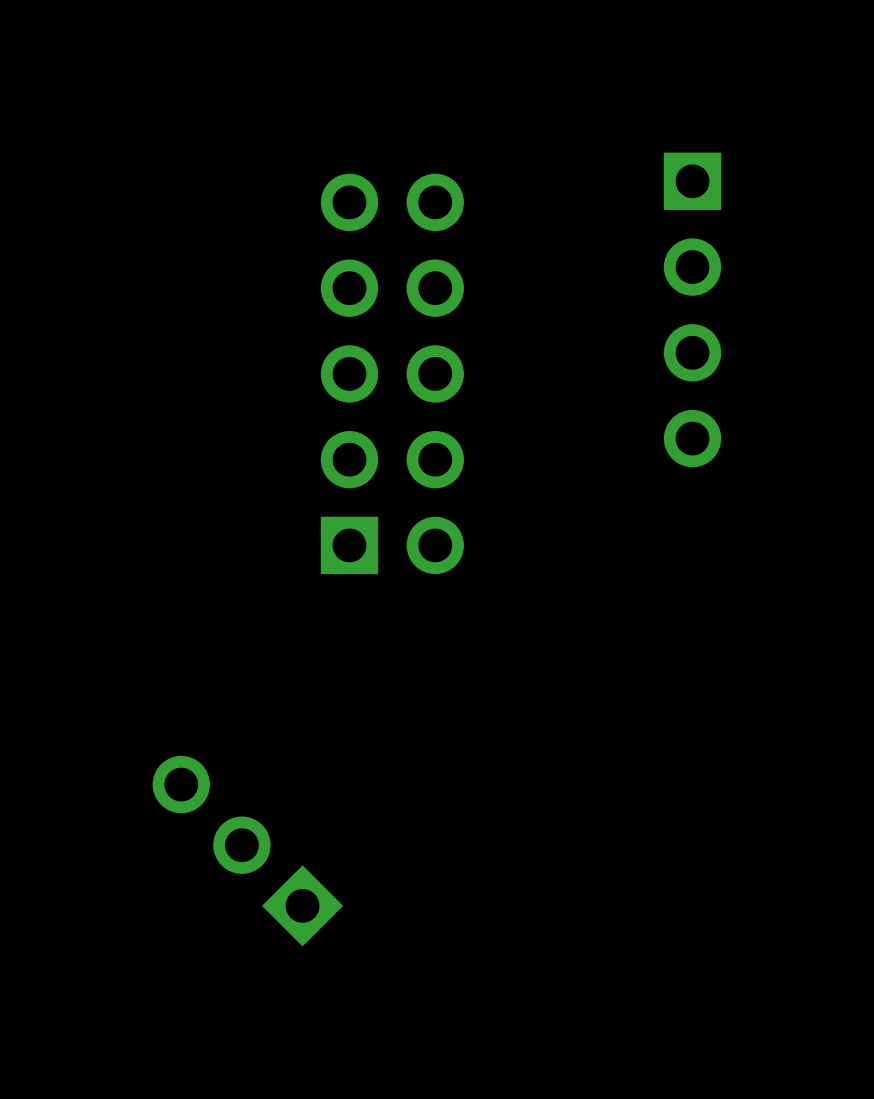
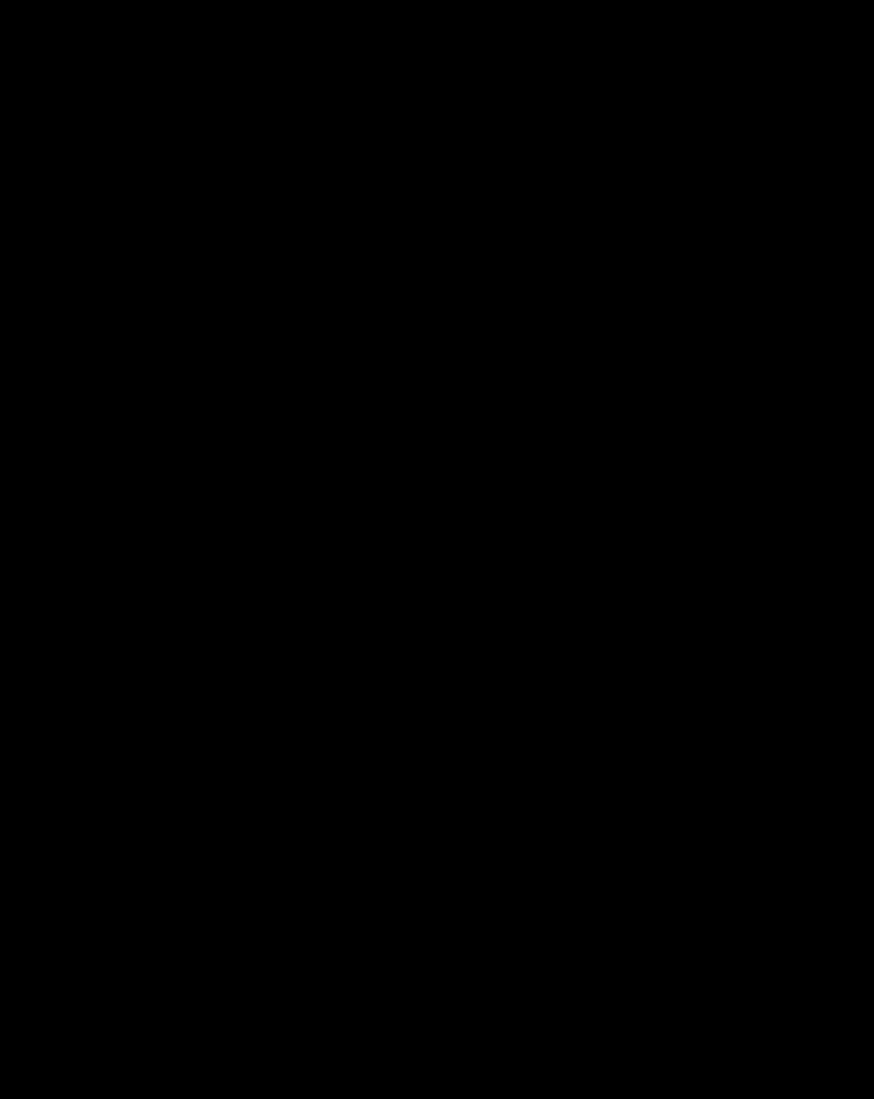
part: (692, 309) -> none
part: (392, 373) -> none
part: (247, 851) -> none

